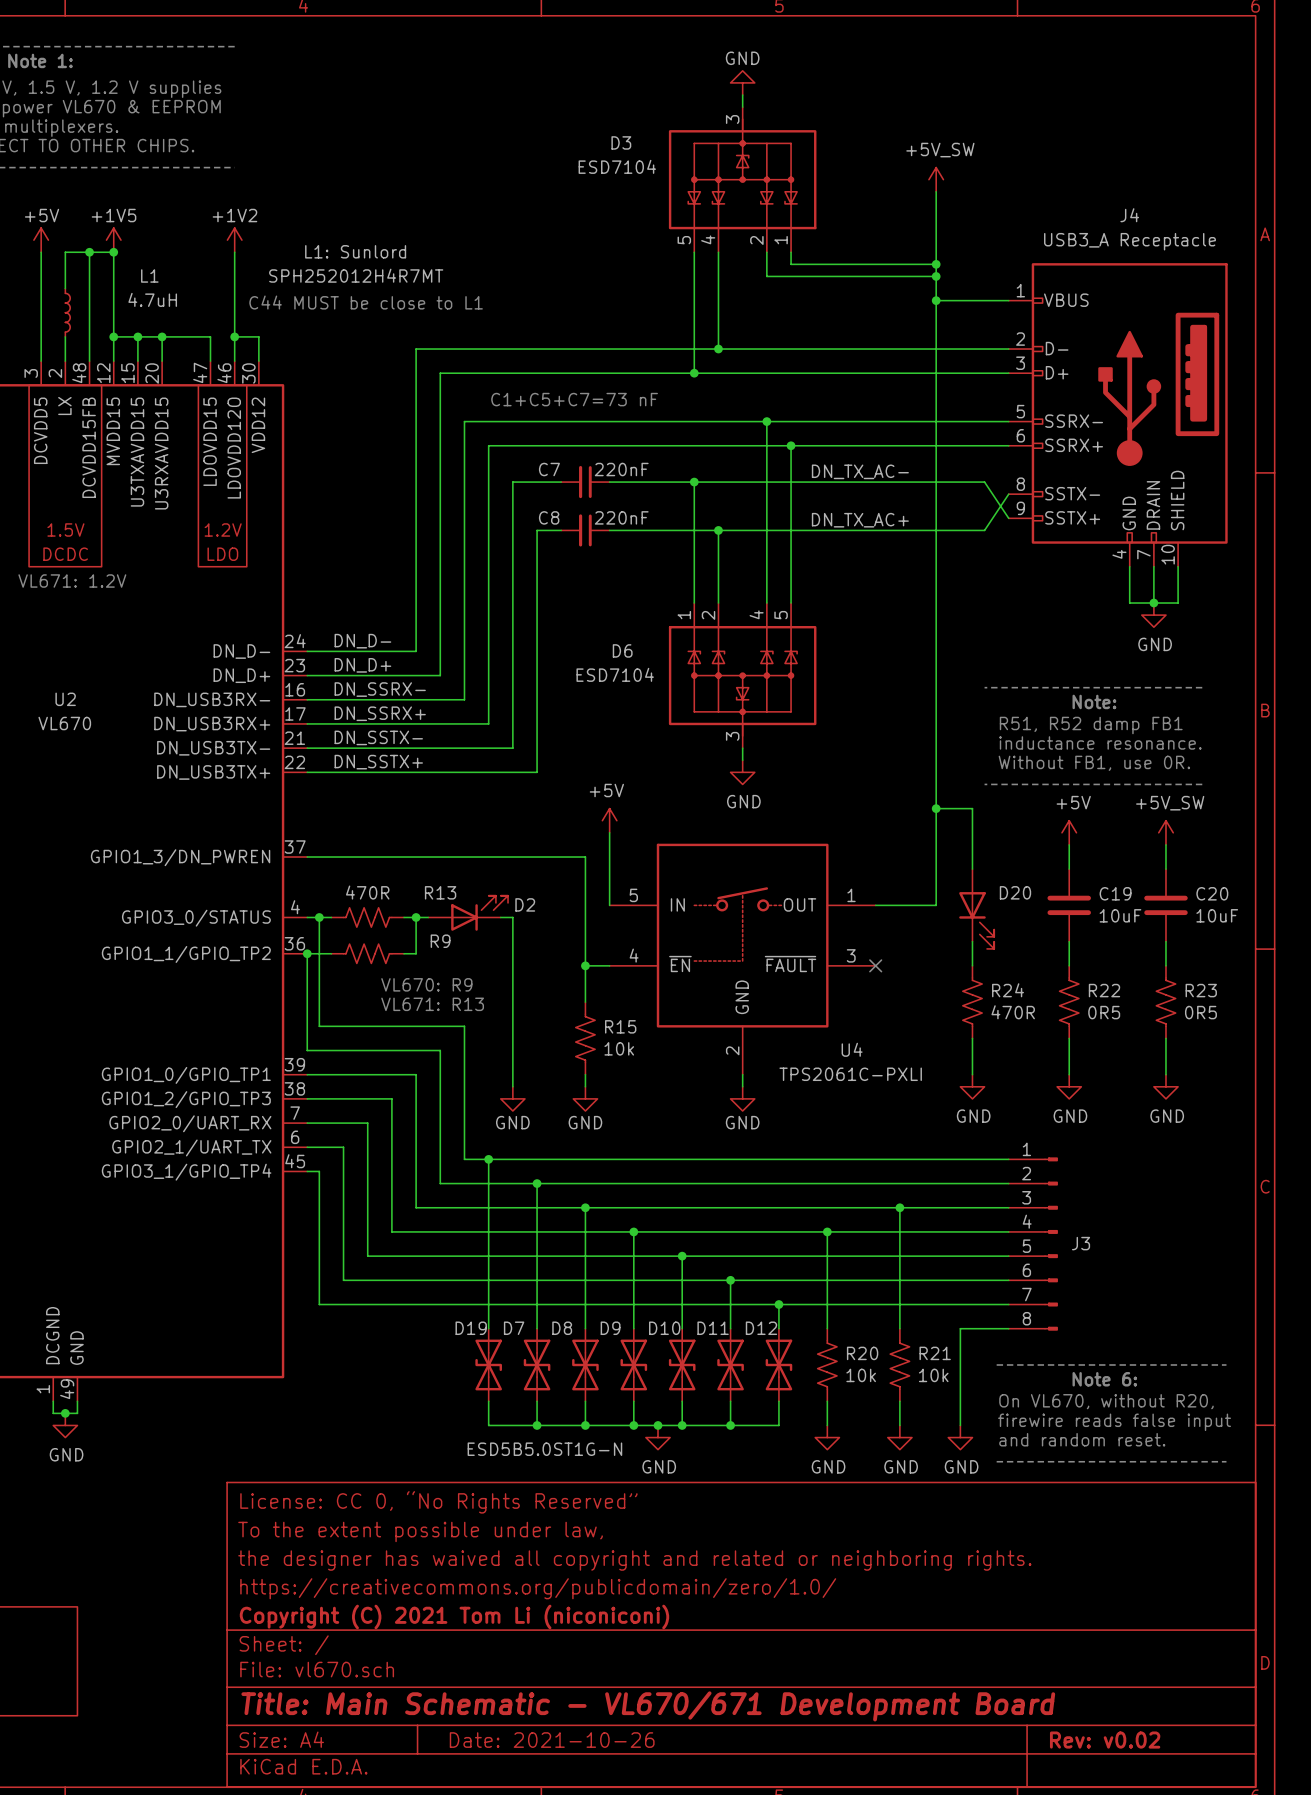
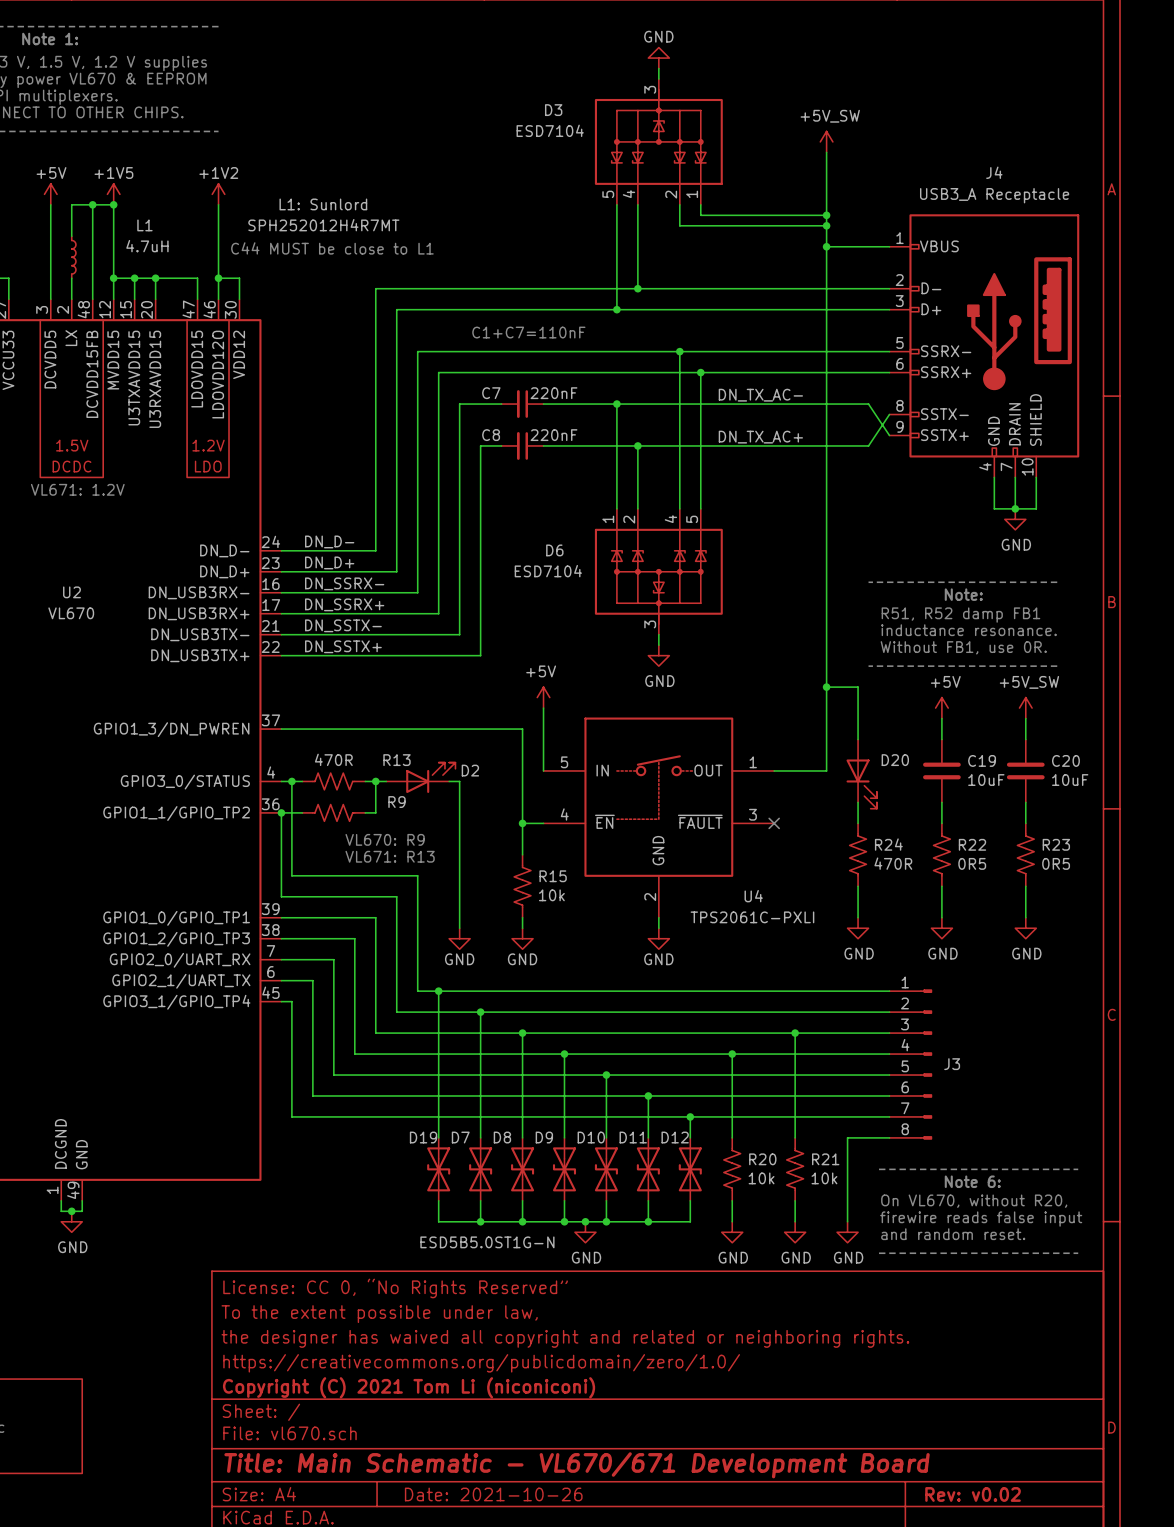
text: C1+C5+C7=73 nF (574, 399) -> C1+C7=110nF (528, 332)

